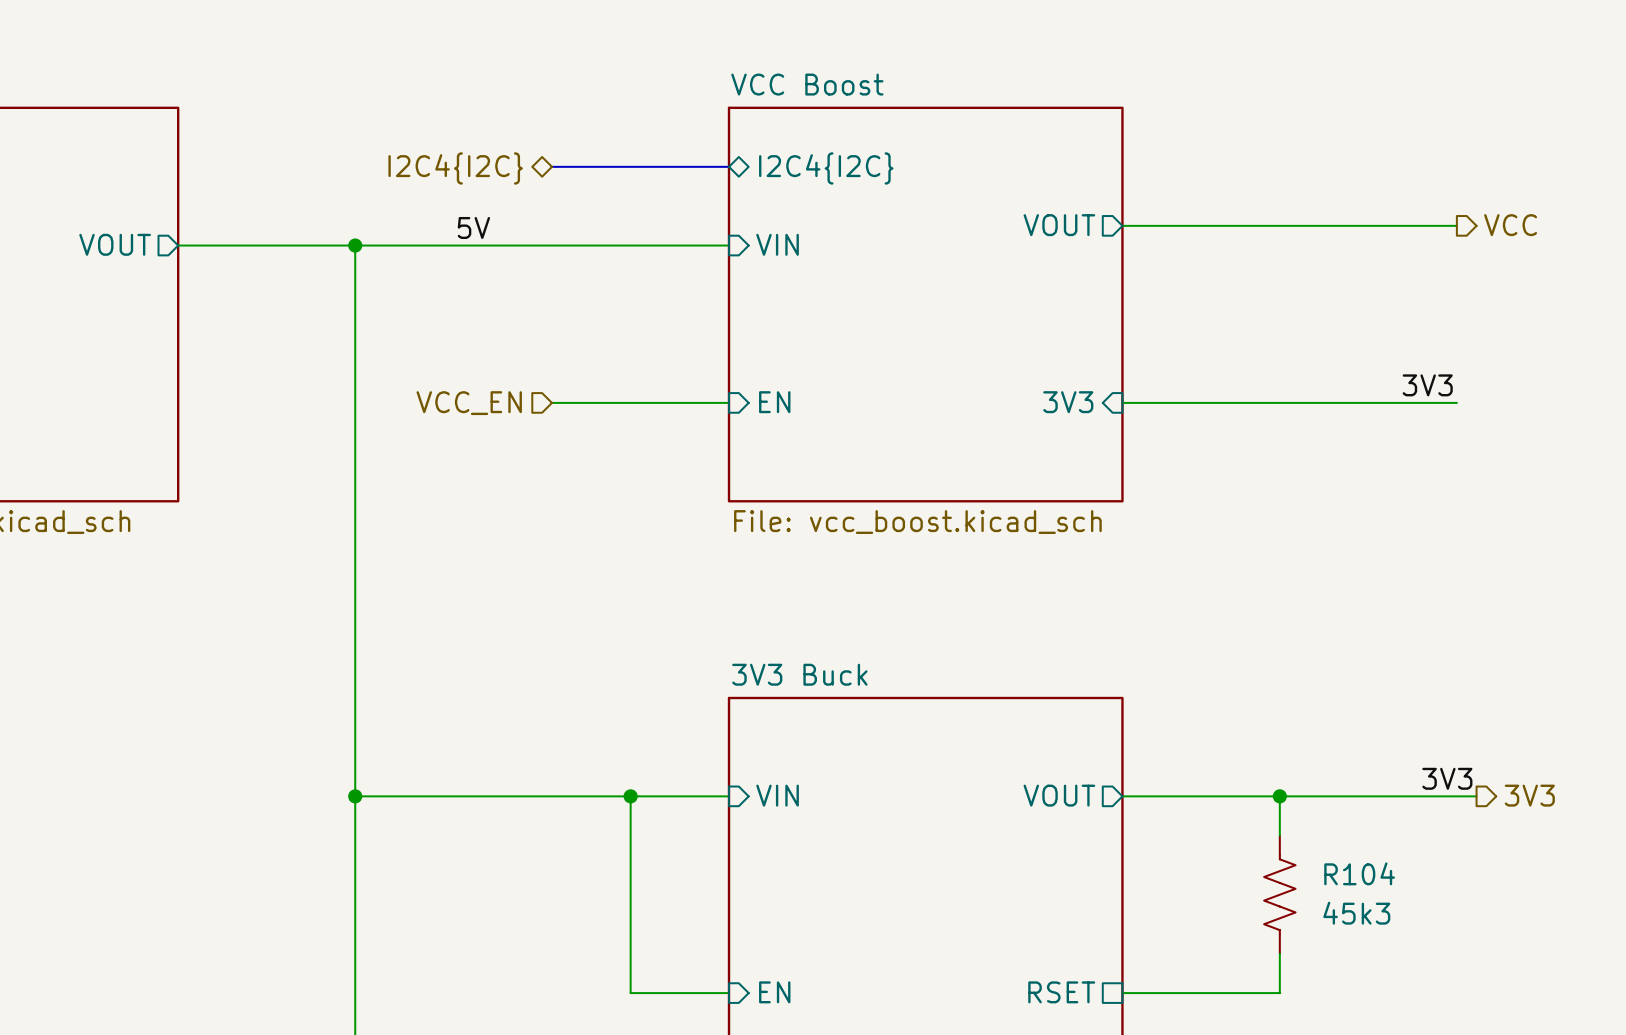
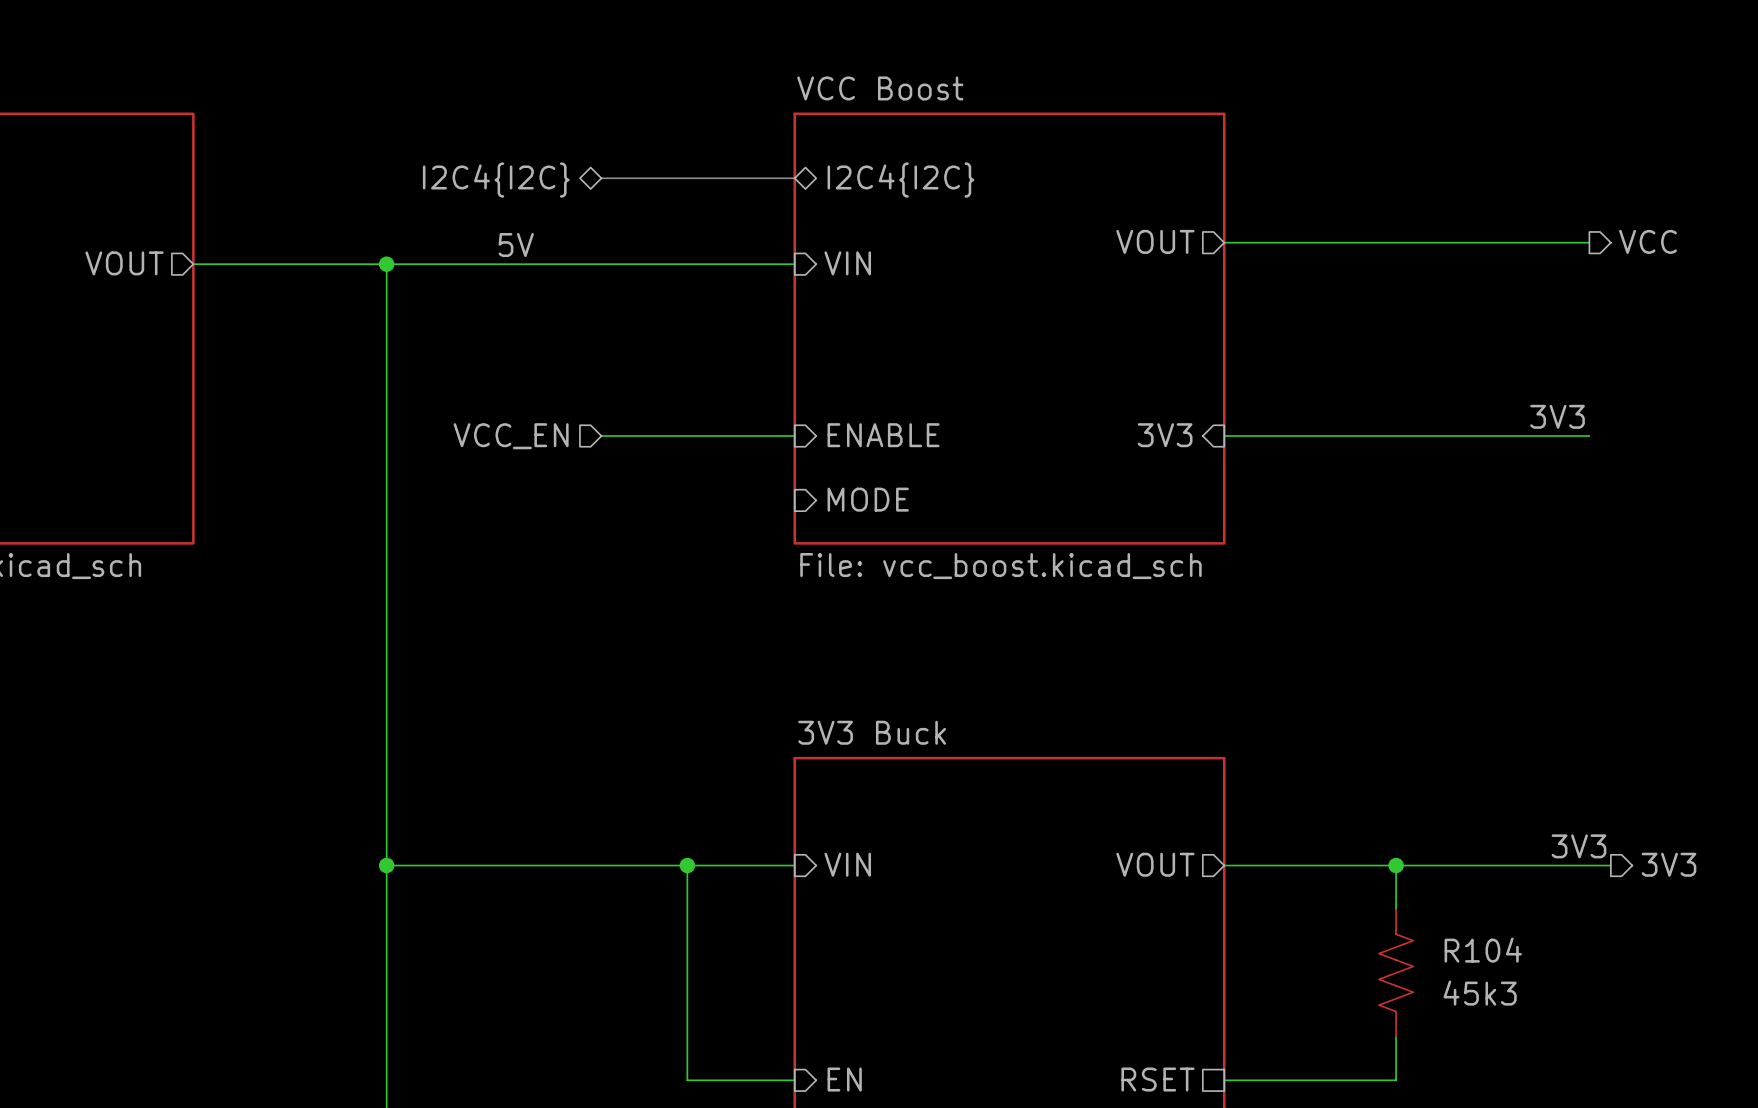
sheet pin: EN (774, 402) -> ENABLE (883, 435)
sheet pin: none -> MODE (868, 499)

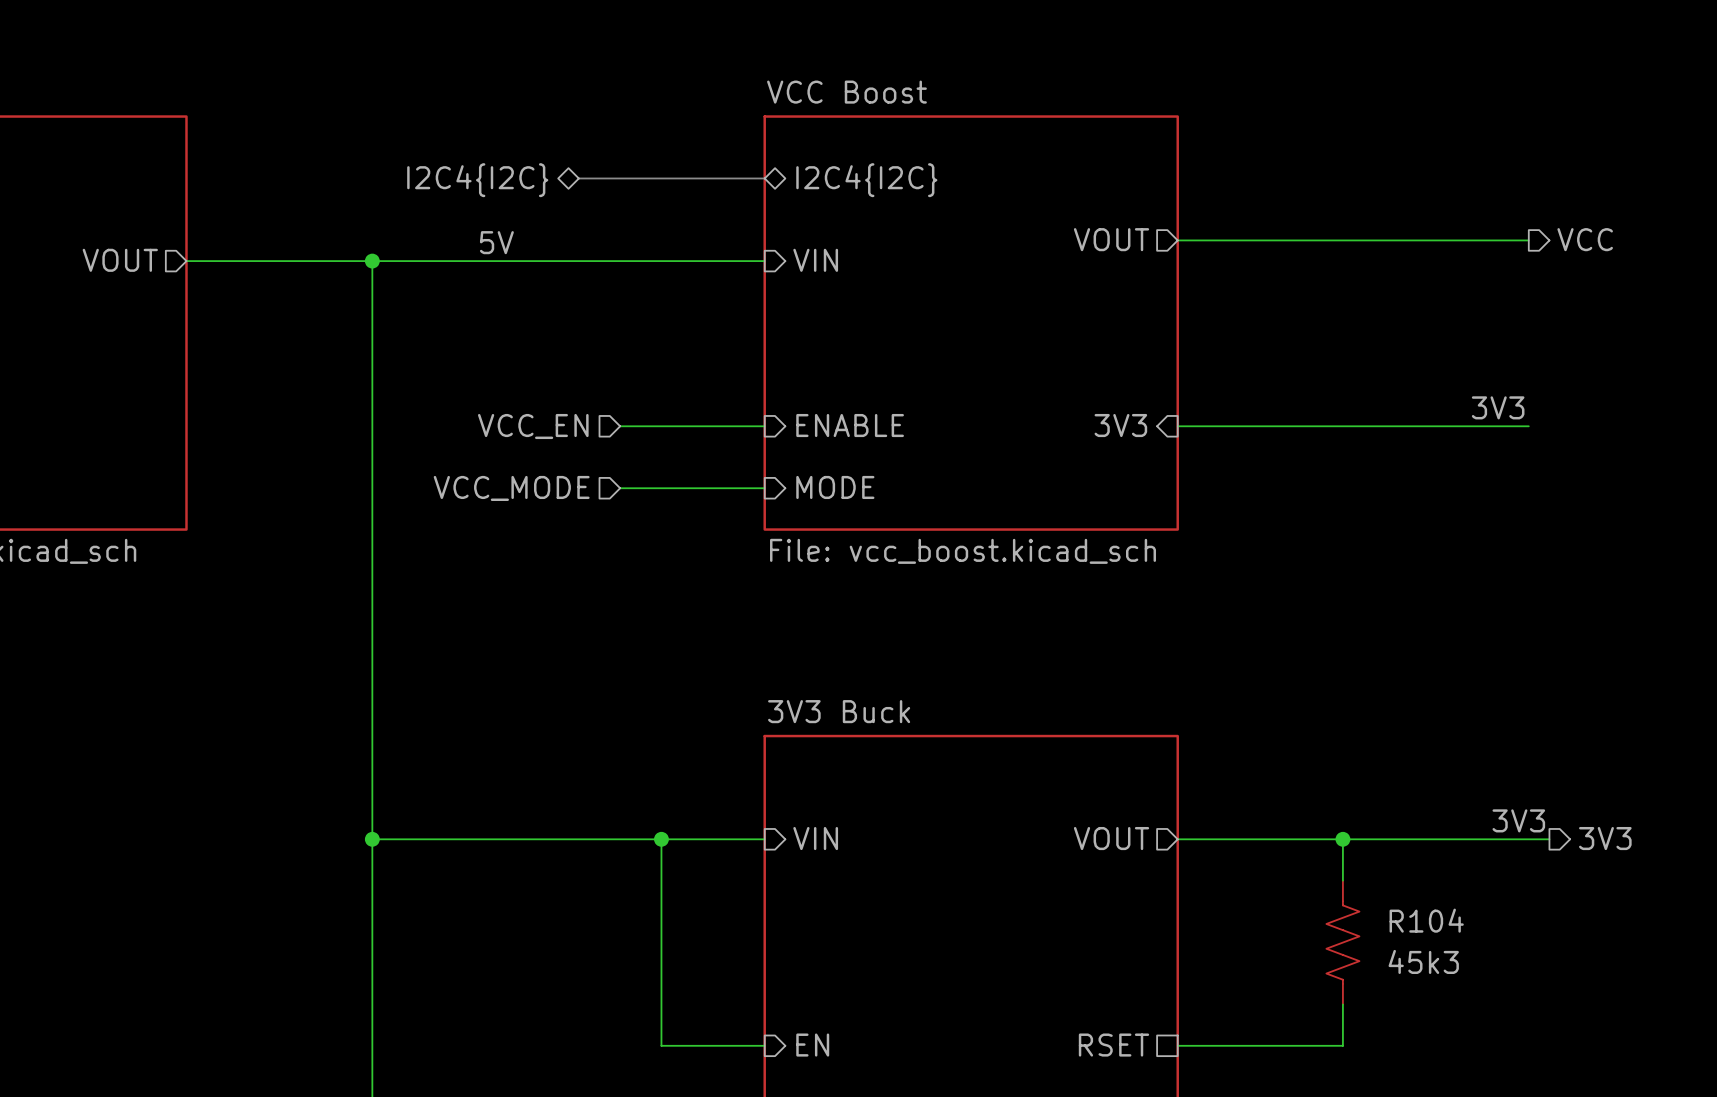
hierarchical label position: VCC_EN (511, 436) -> VCC_EN (533, 426)
wire: (601, 436) (644, 436) -> none
hierarchical label: none -> VCC_MODE (511, 488)
wire: none -> (620, 488) (764, 488)

